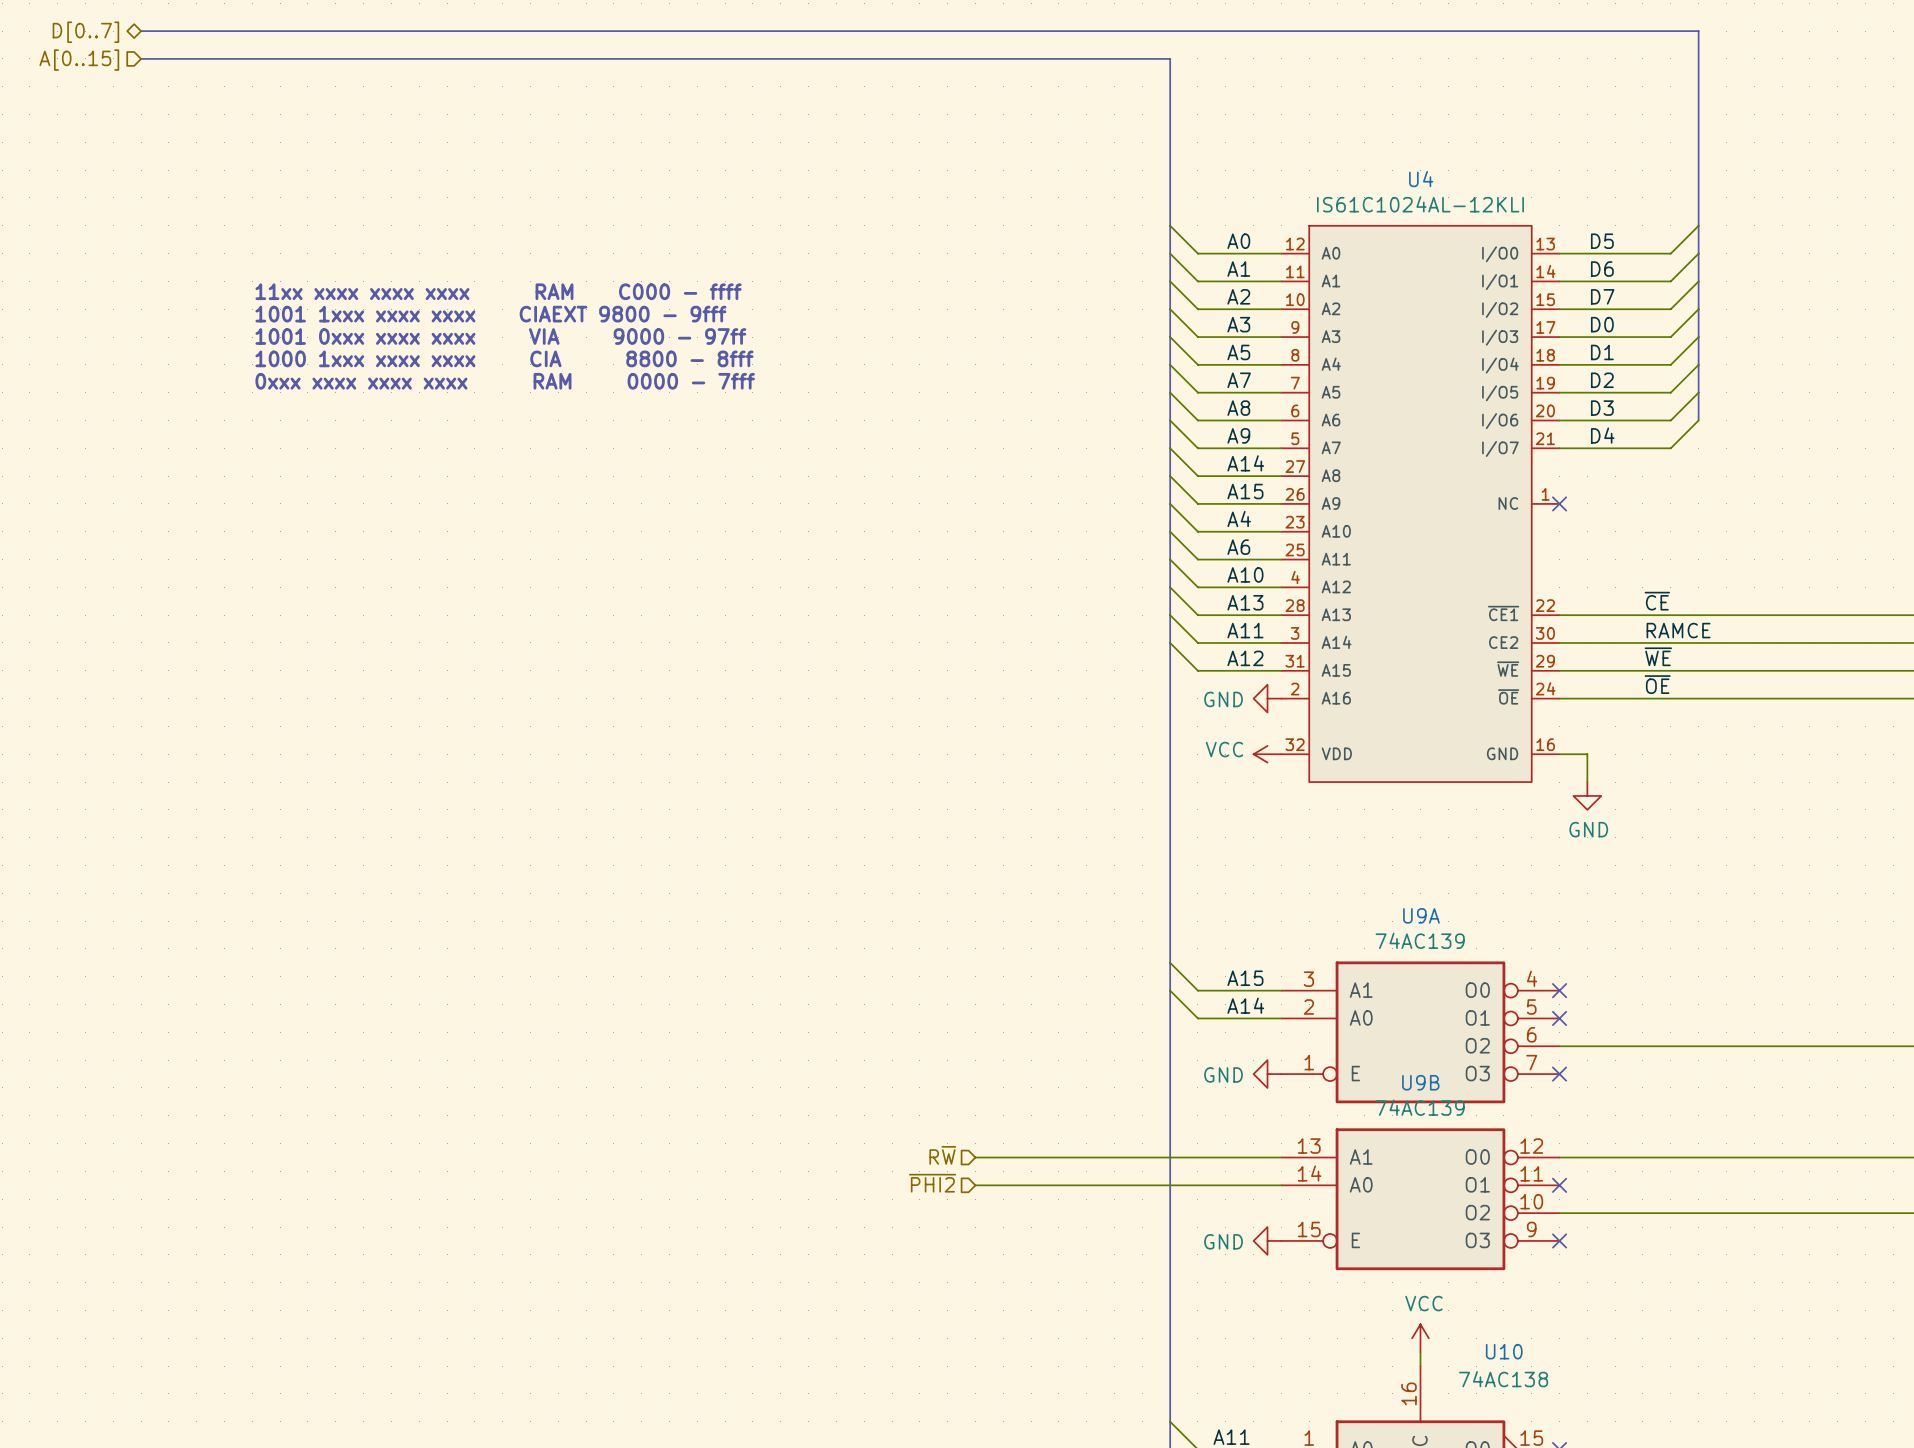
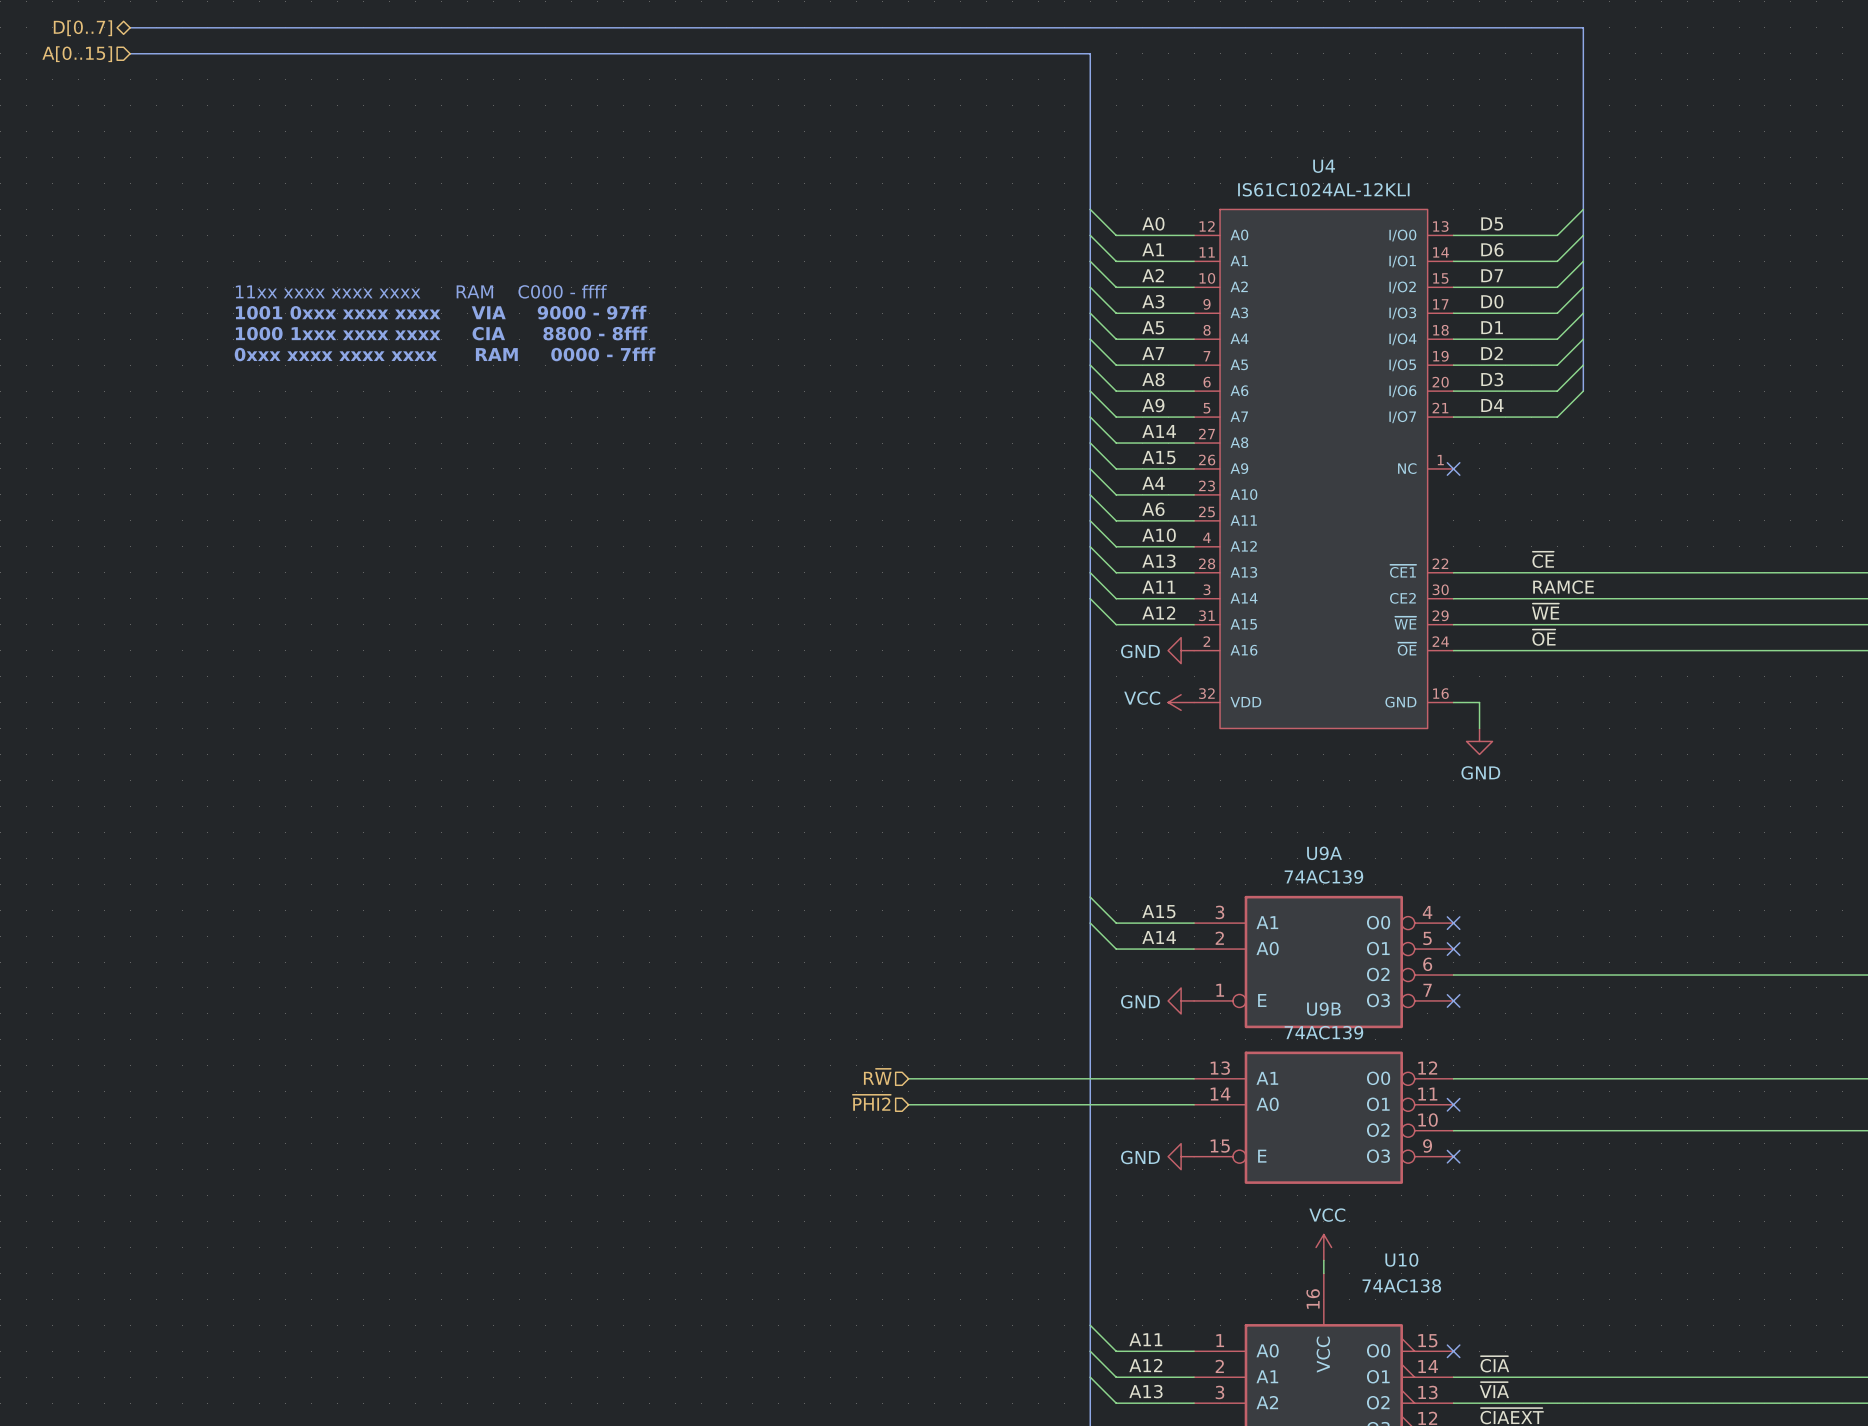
text: 11xx xxxx xxxx xxxx RAM C000 - ffff (498, 291) -> none
text: 1001 1xxx xxxx xxxx CIAEXT 9800 - 9fff (490, 314) -> 11xx xxxx xxxx xxxx RAM C000 - ffff (421, 291)

